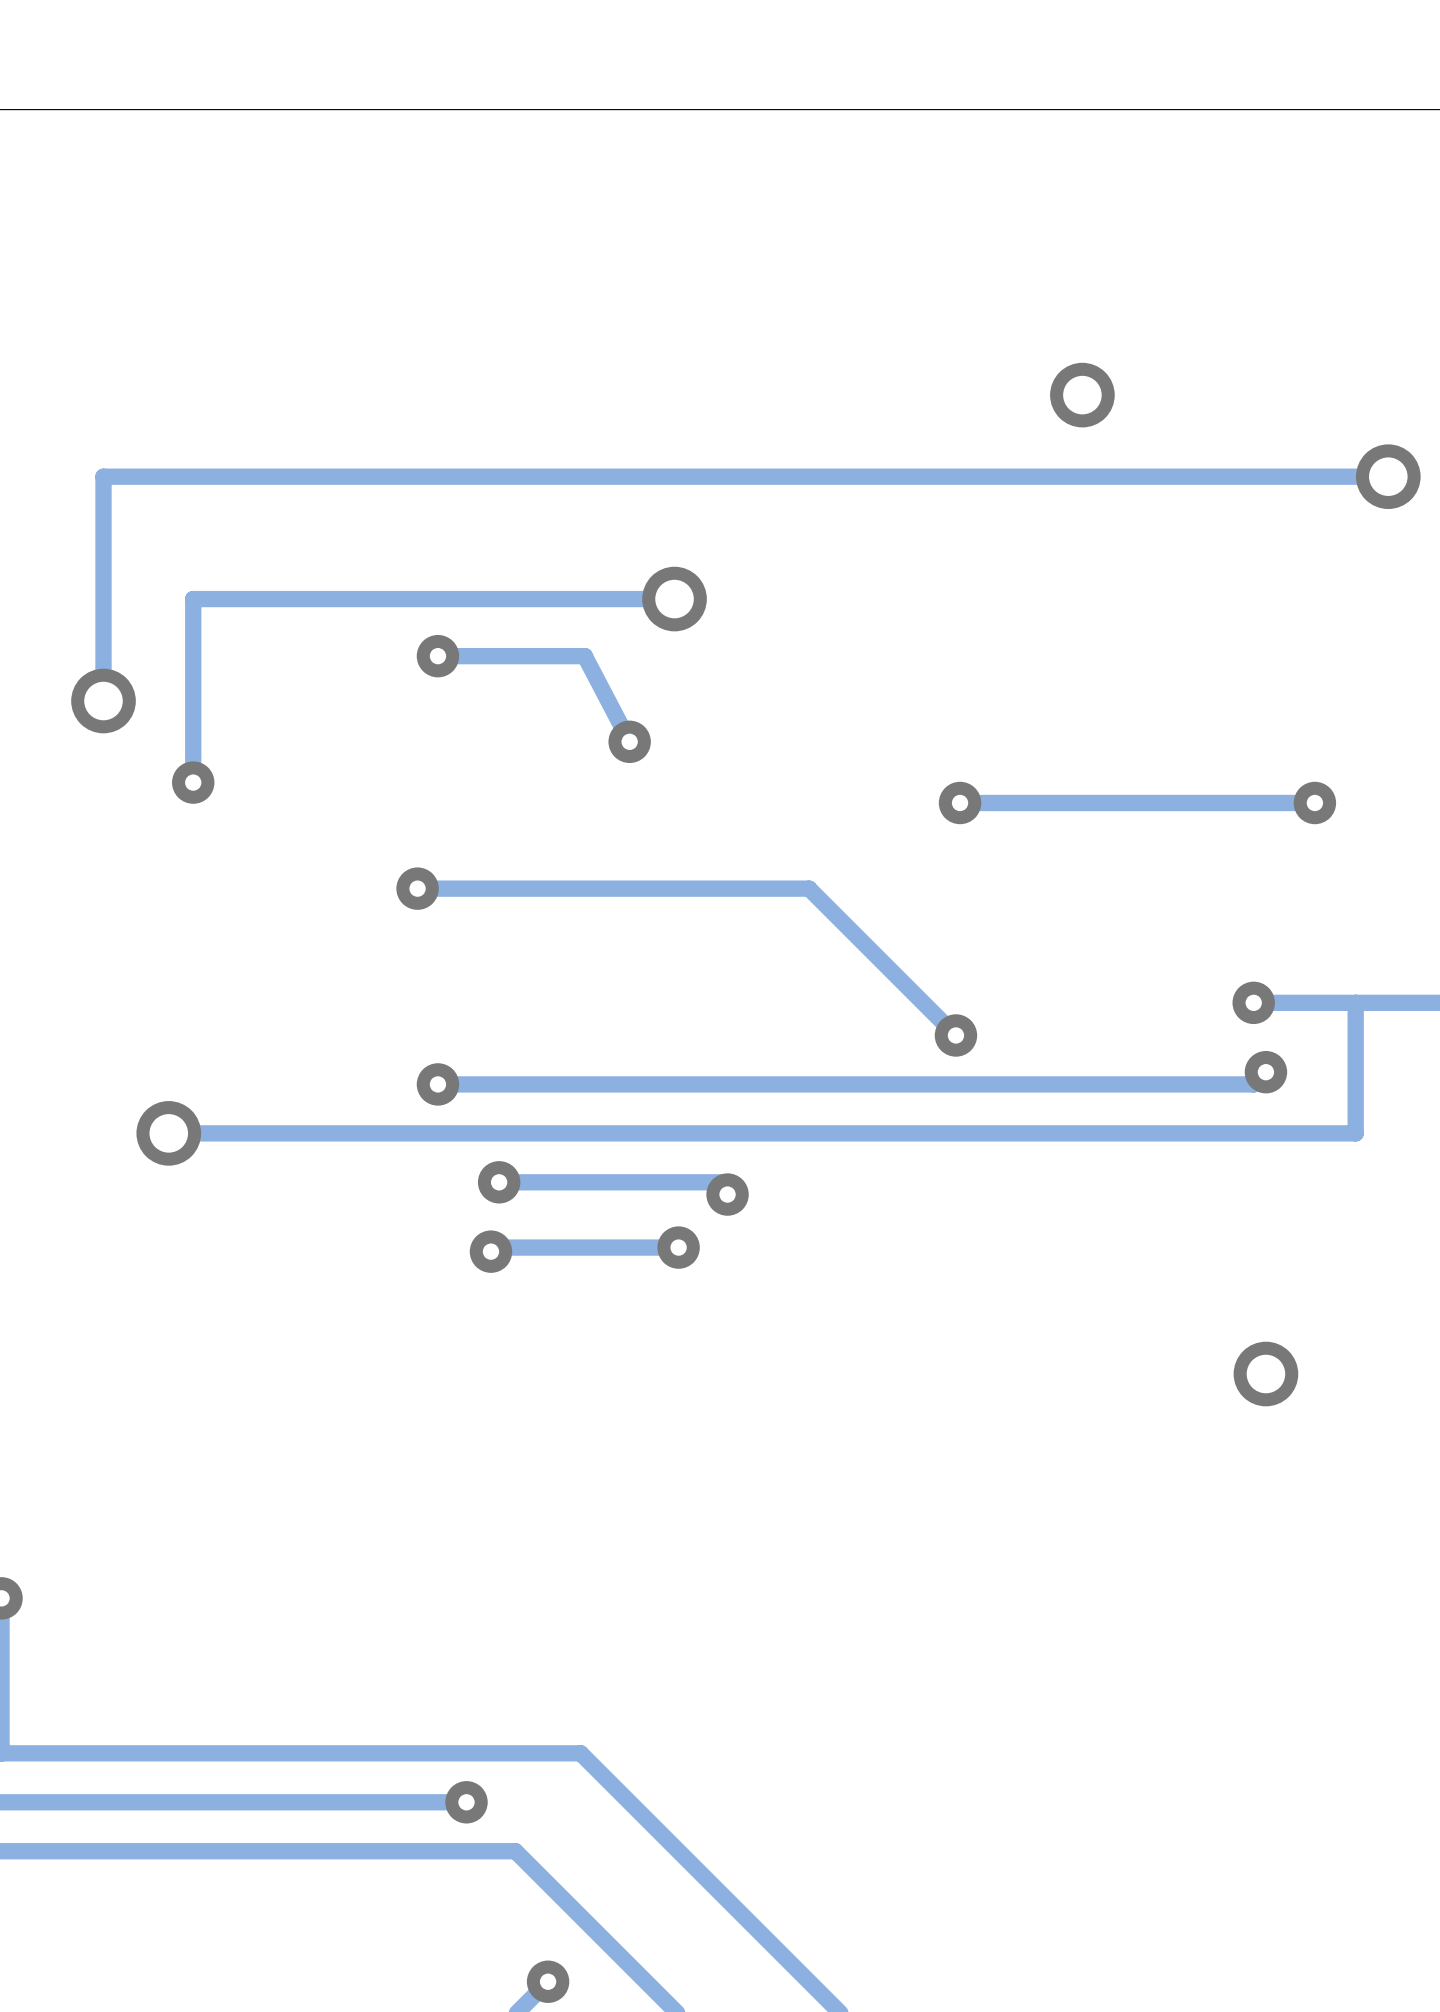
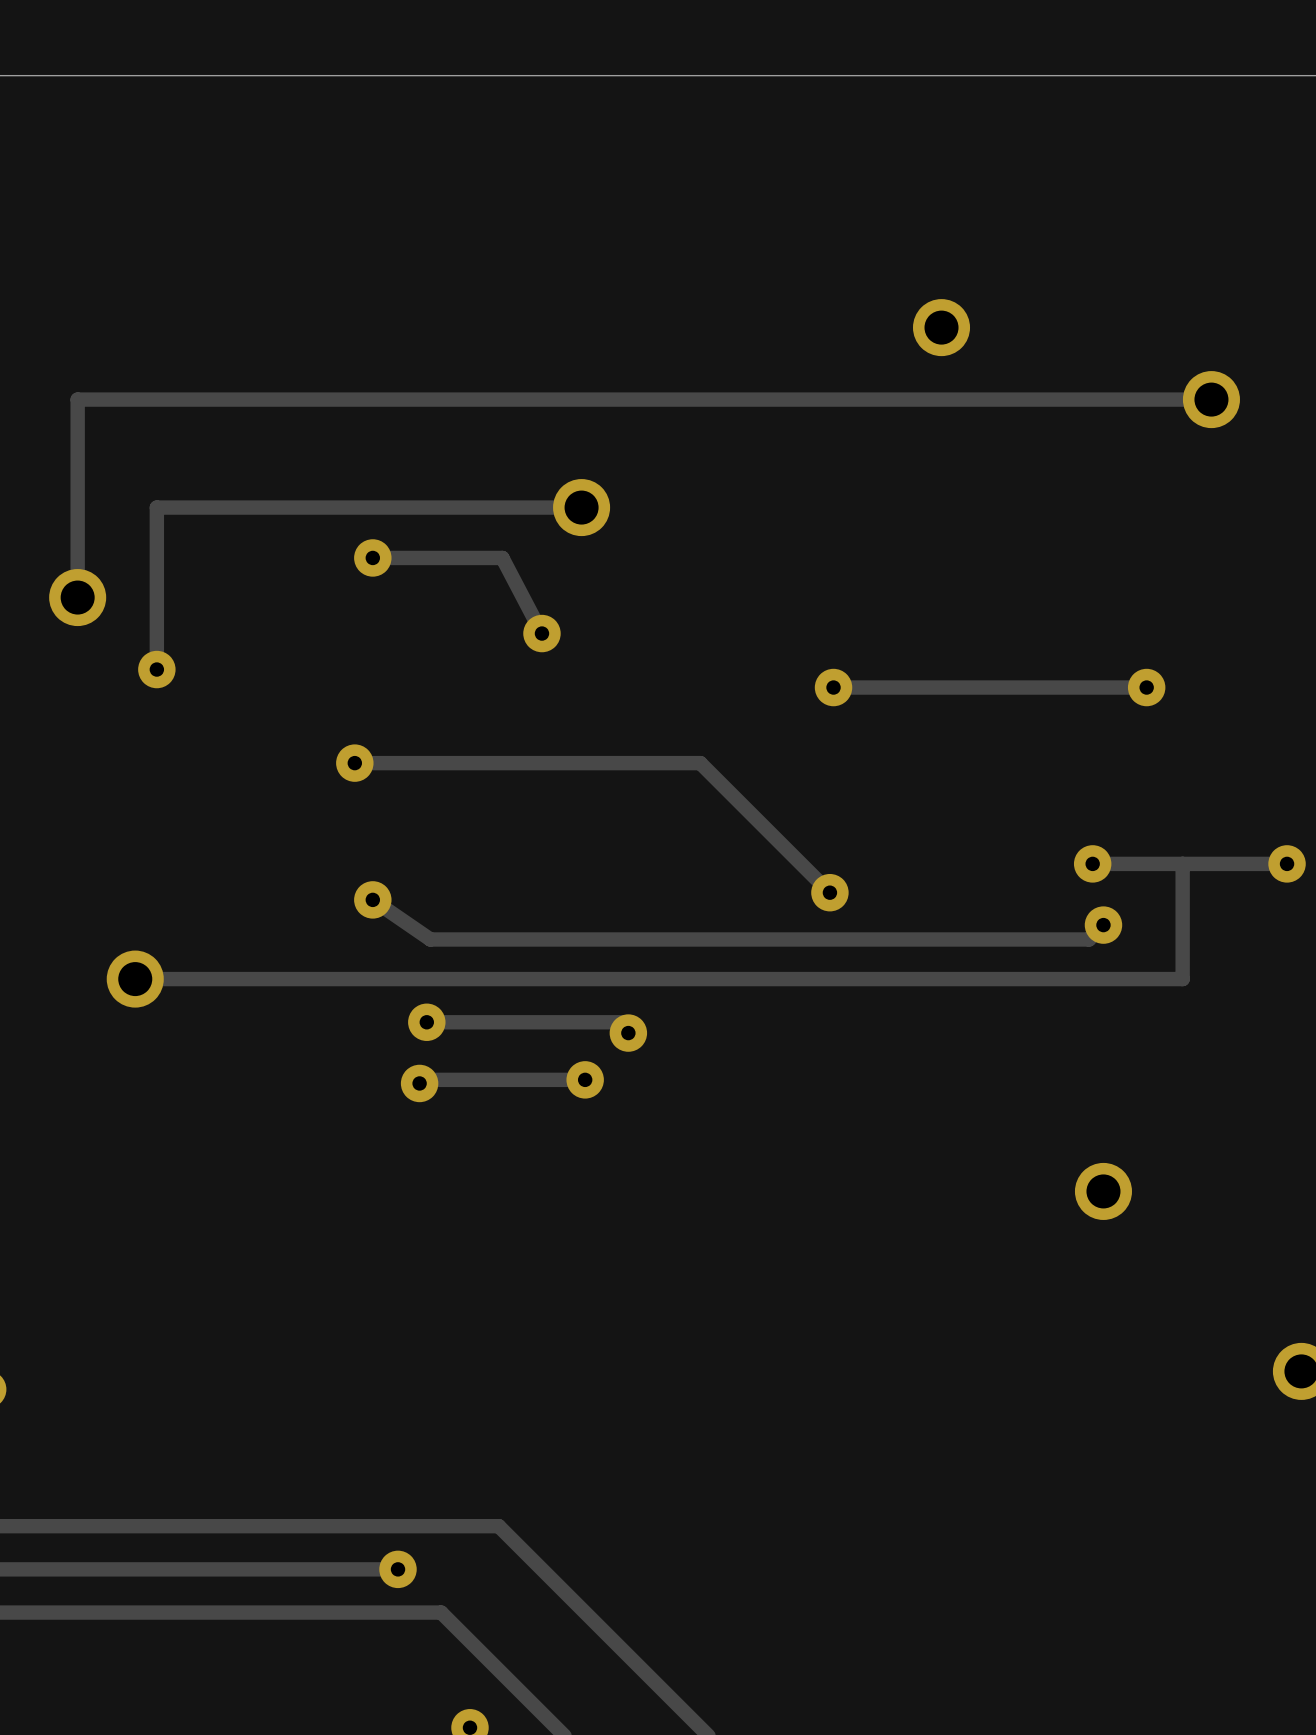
via position: (437, 1084) -> (372, 899)
track: (1253, 1084) (437, 1084) -> (1092, 935) (1089, 939) (430, 939) (372, 899)

